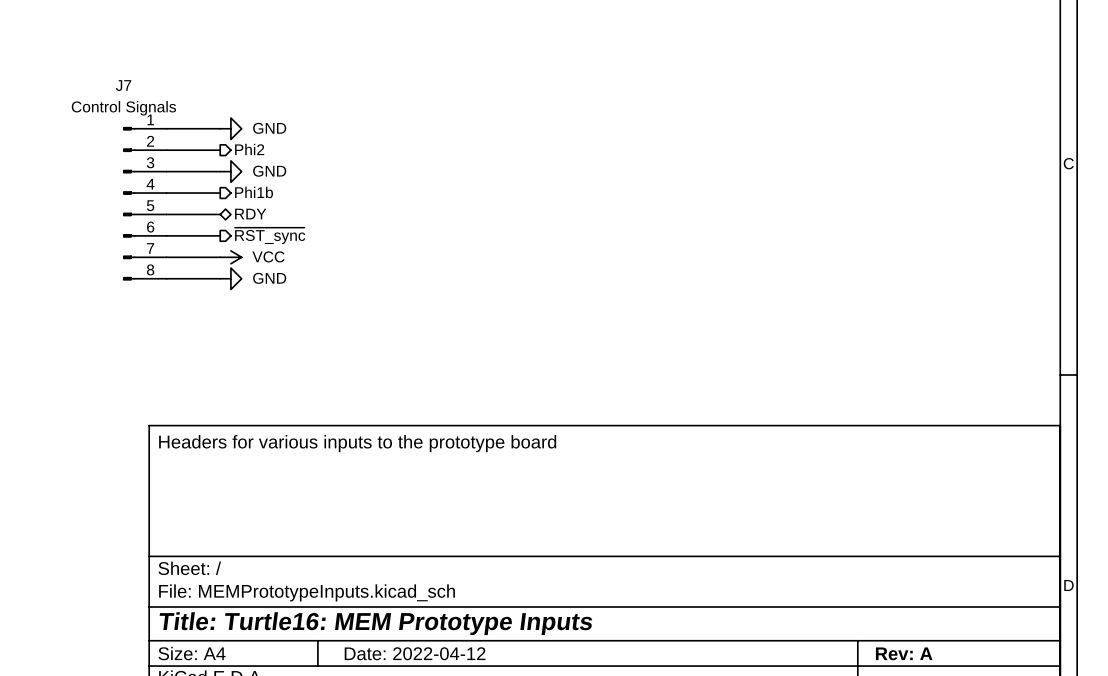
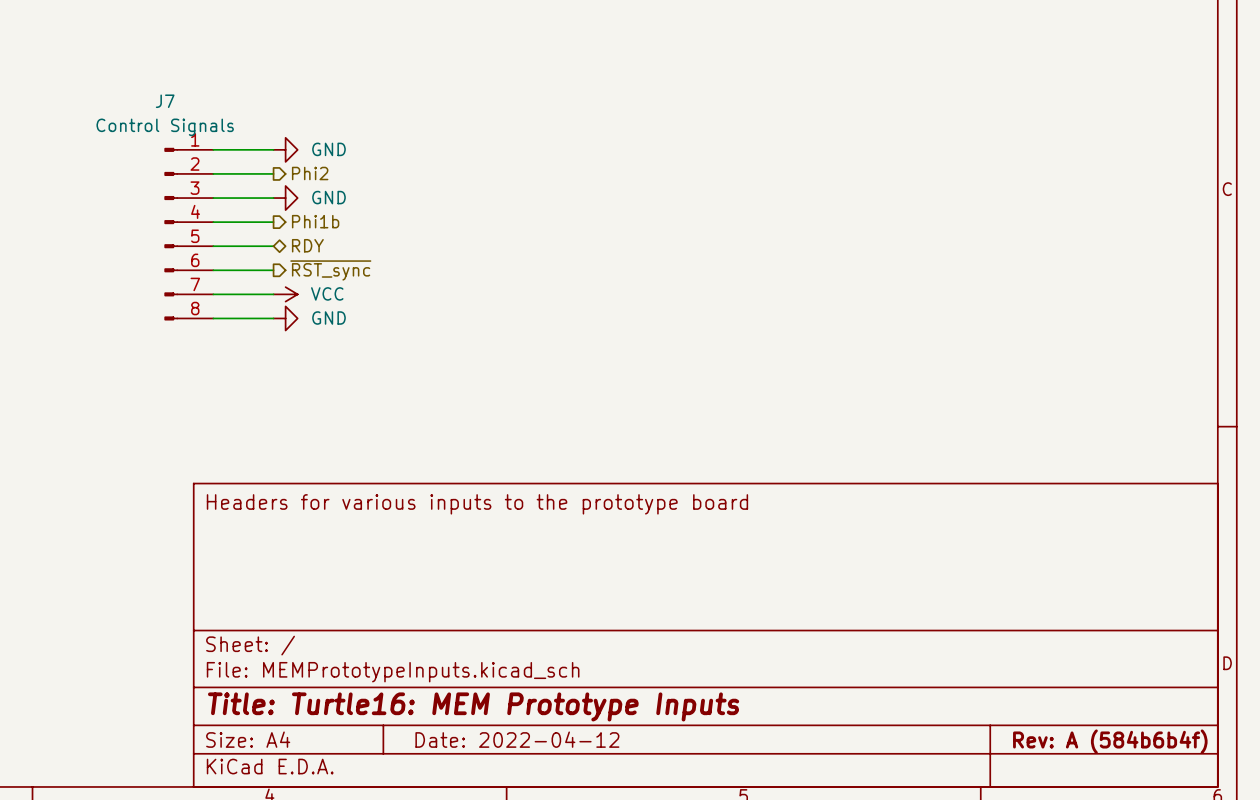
title block: Rev: A (904, 653) -> Rev: A (584b6b4f) (1110, 741)

